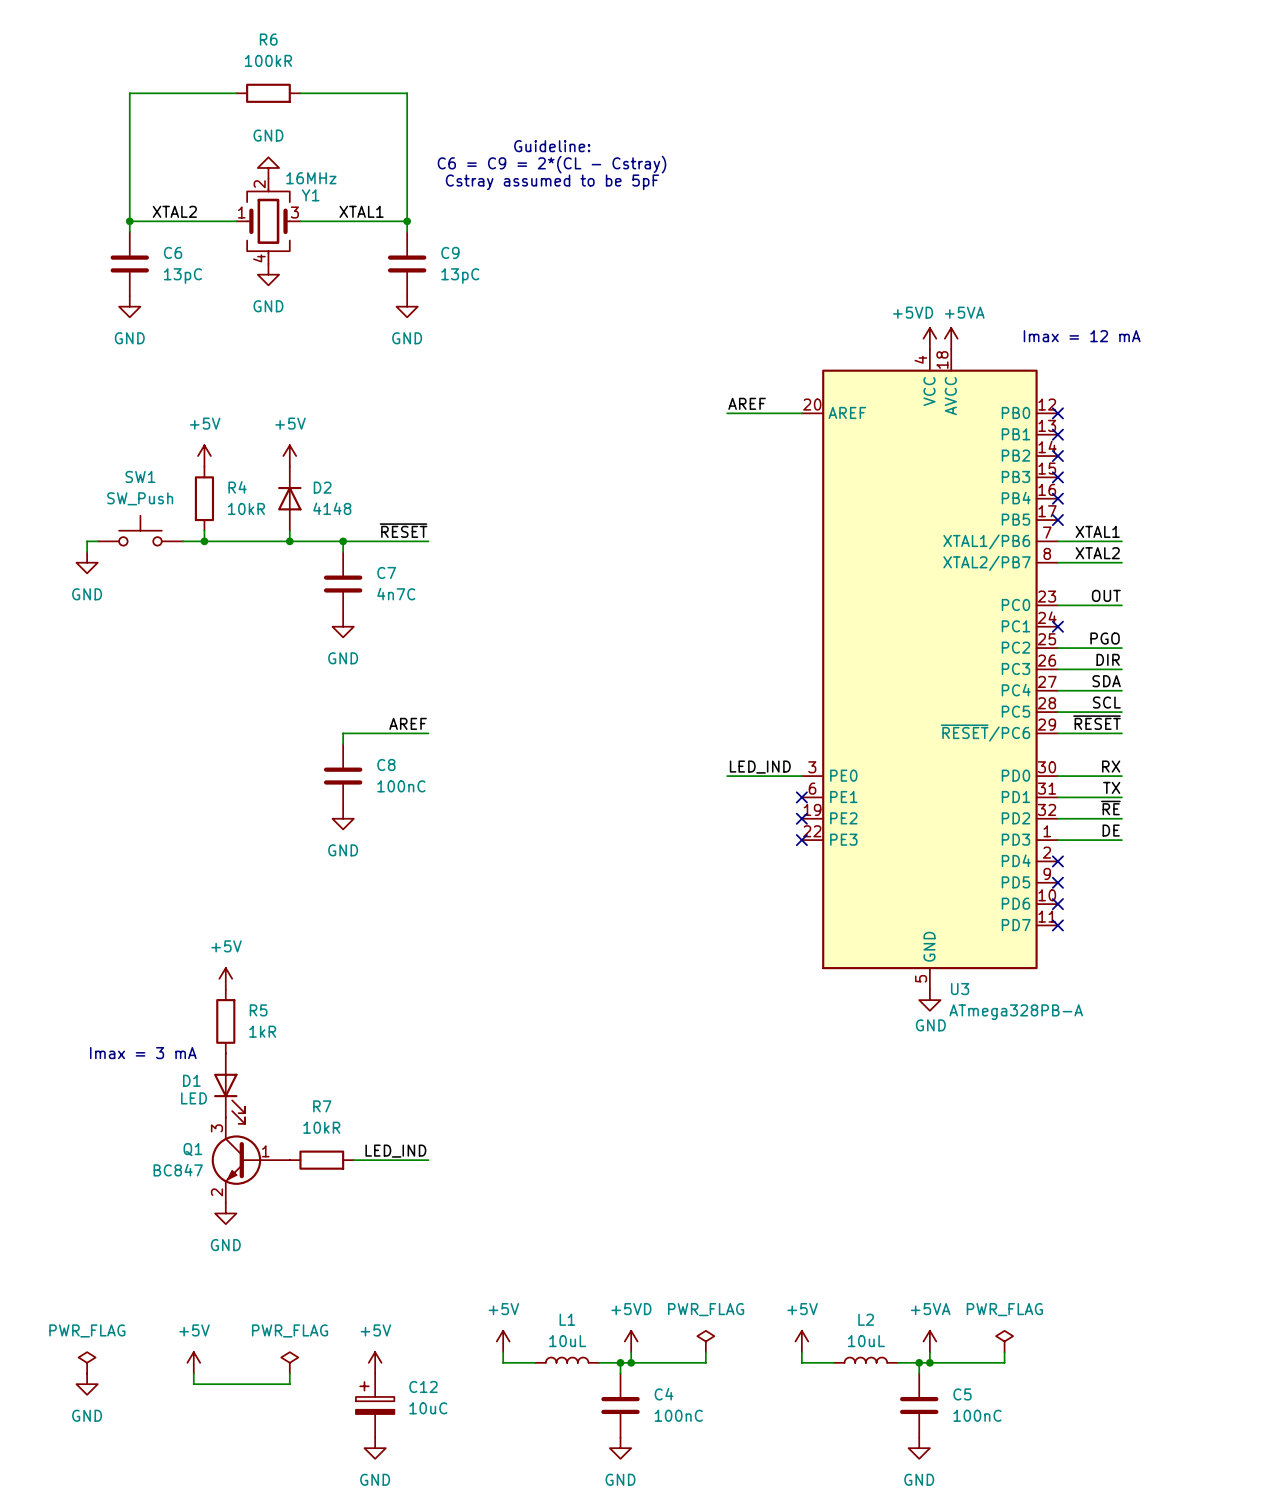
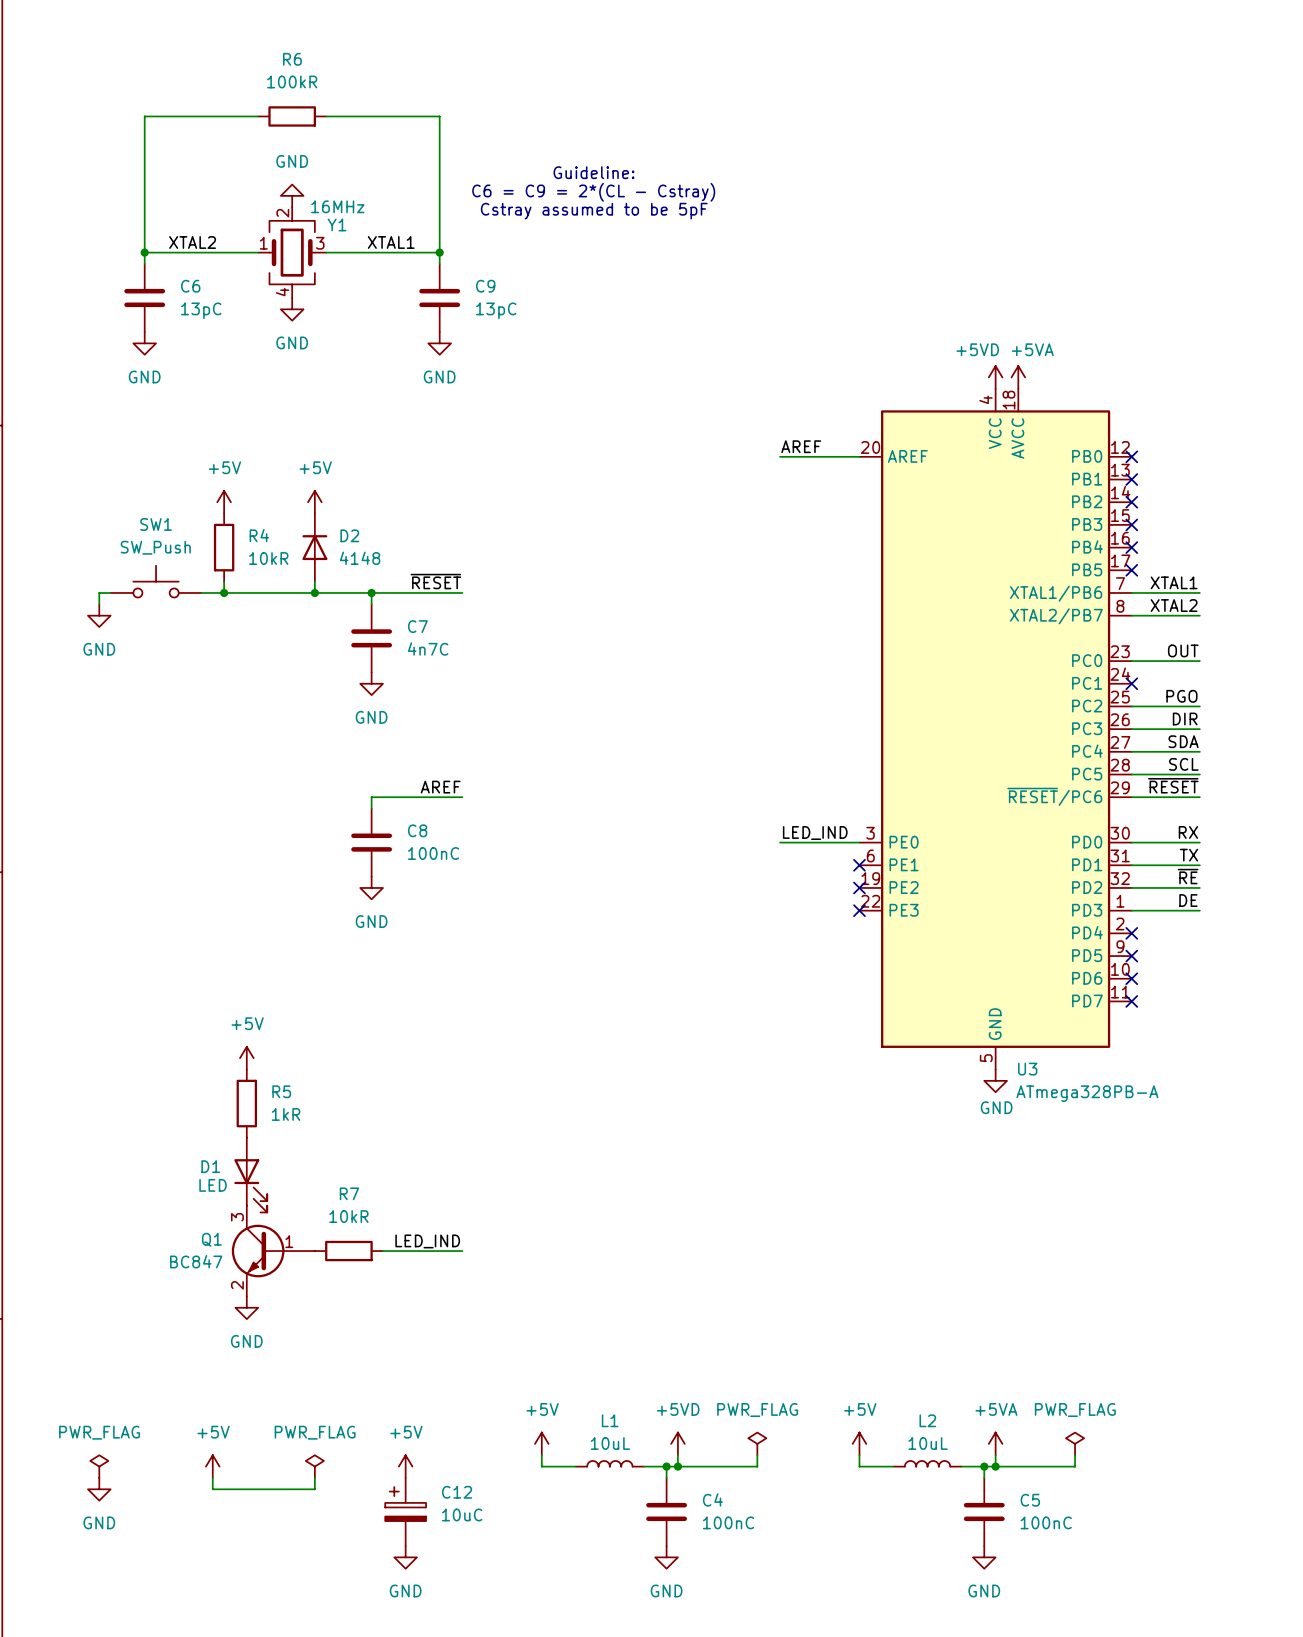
text: Imax = 12 mA (1082, 336) -> none
text: Imax = 3 mA (143, 1053) -> none

